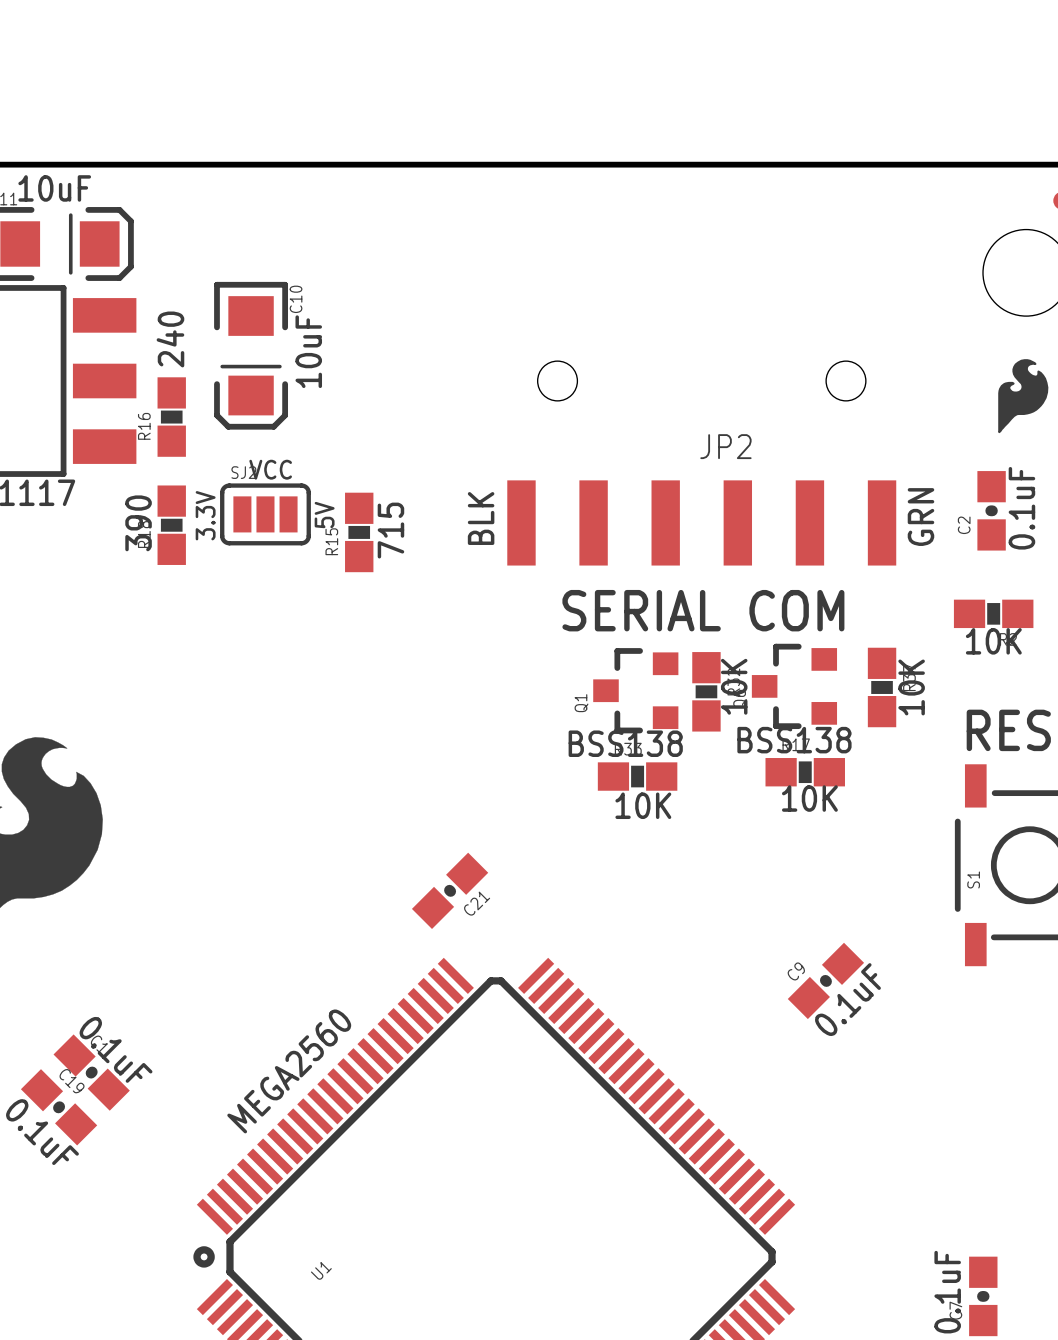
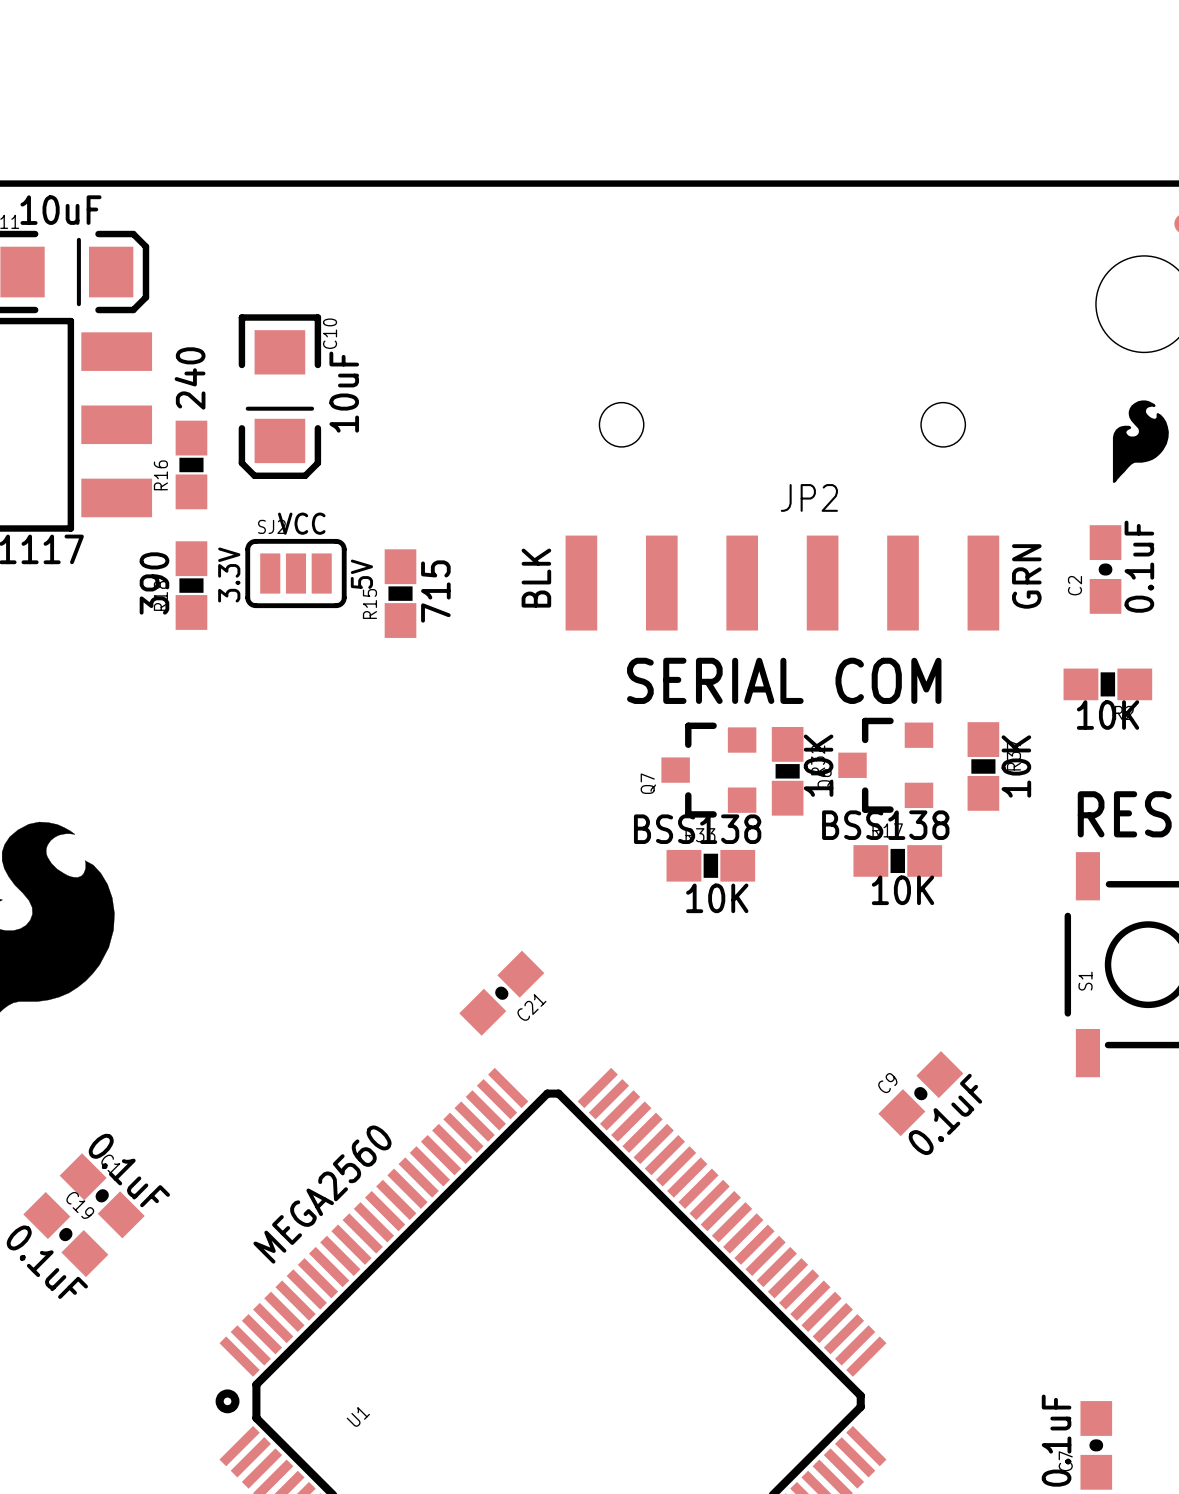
Q1 name: Q1 (581, 703) -> Q7 (648, 783)

